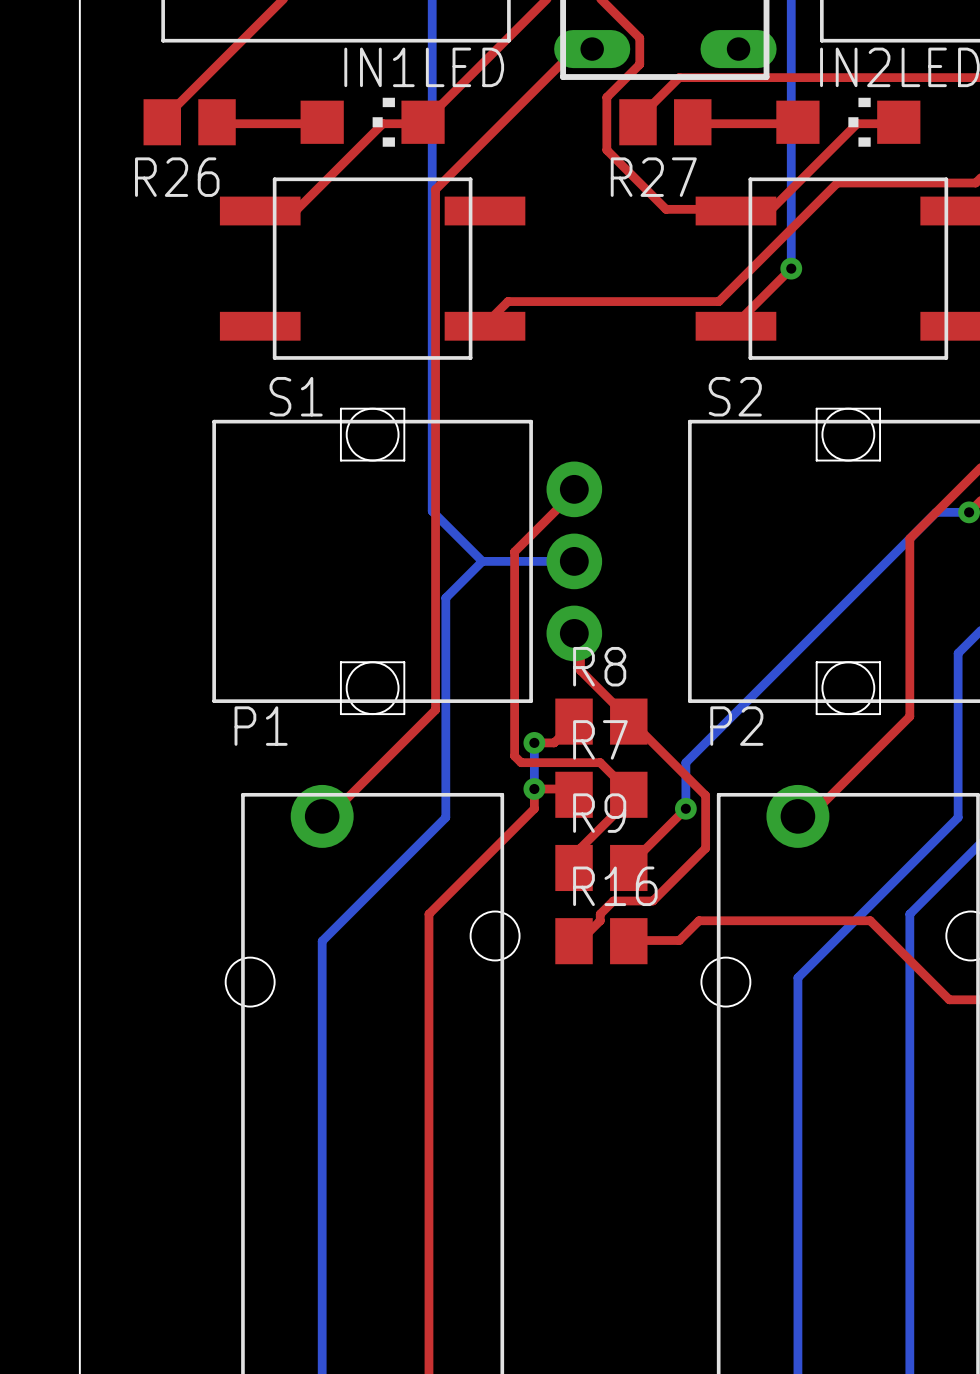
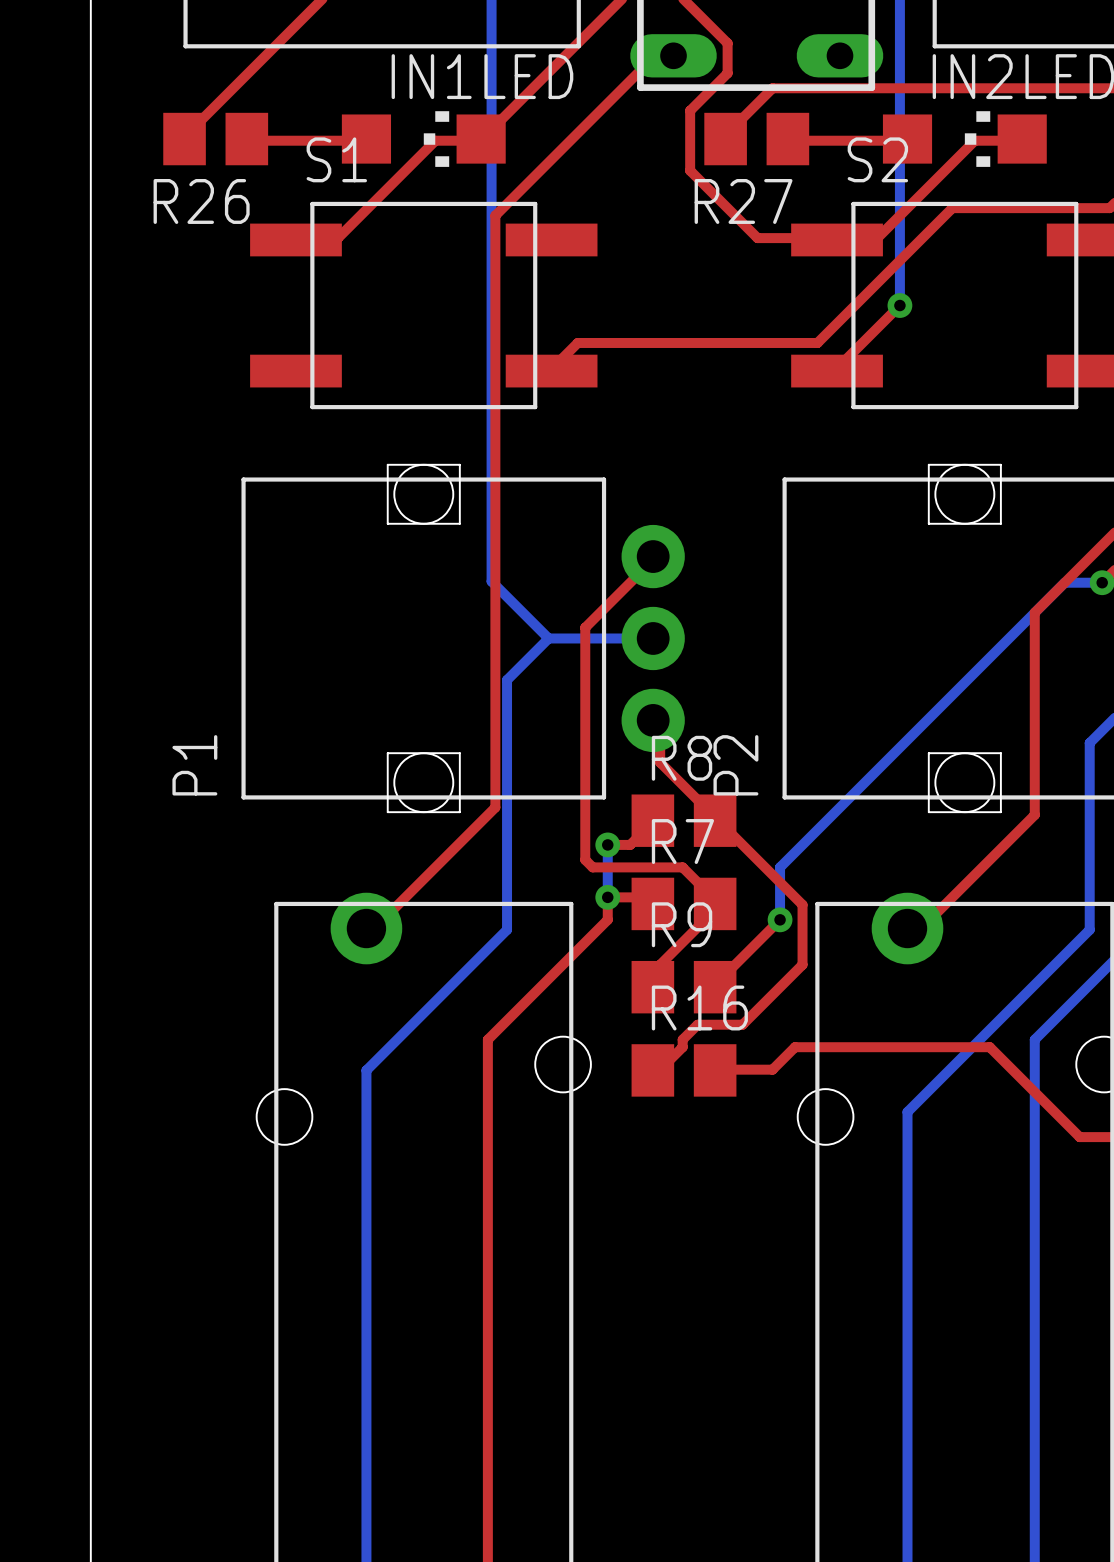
S1 name position: S1 (296, 396) -> S1 (336, 159)
S2 name position: S2 (735, 396) -> S2 (877, 159)
P1 name rotation: 0° (261, 726) -> 90° counterclockwise (194, 765)
P1 name position: P1 (261, 726) -> P1 (194, 765)
P2 name rotation: 0° (736, 726) -> 90° counterclockwise (735, 765)
P2 name position: P2 (736, 726) -> P2 (735, 765)

